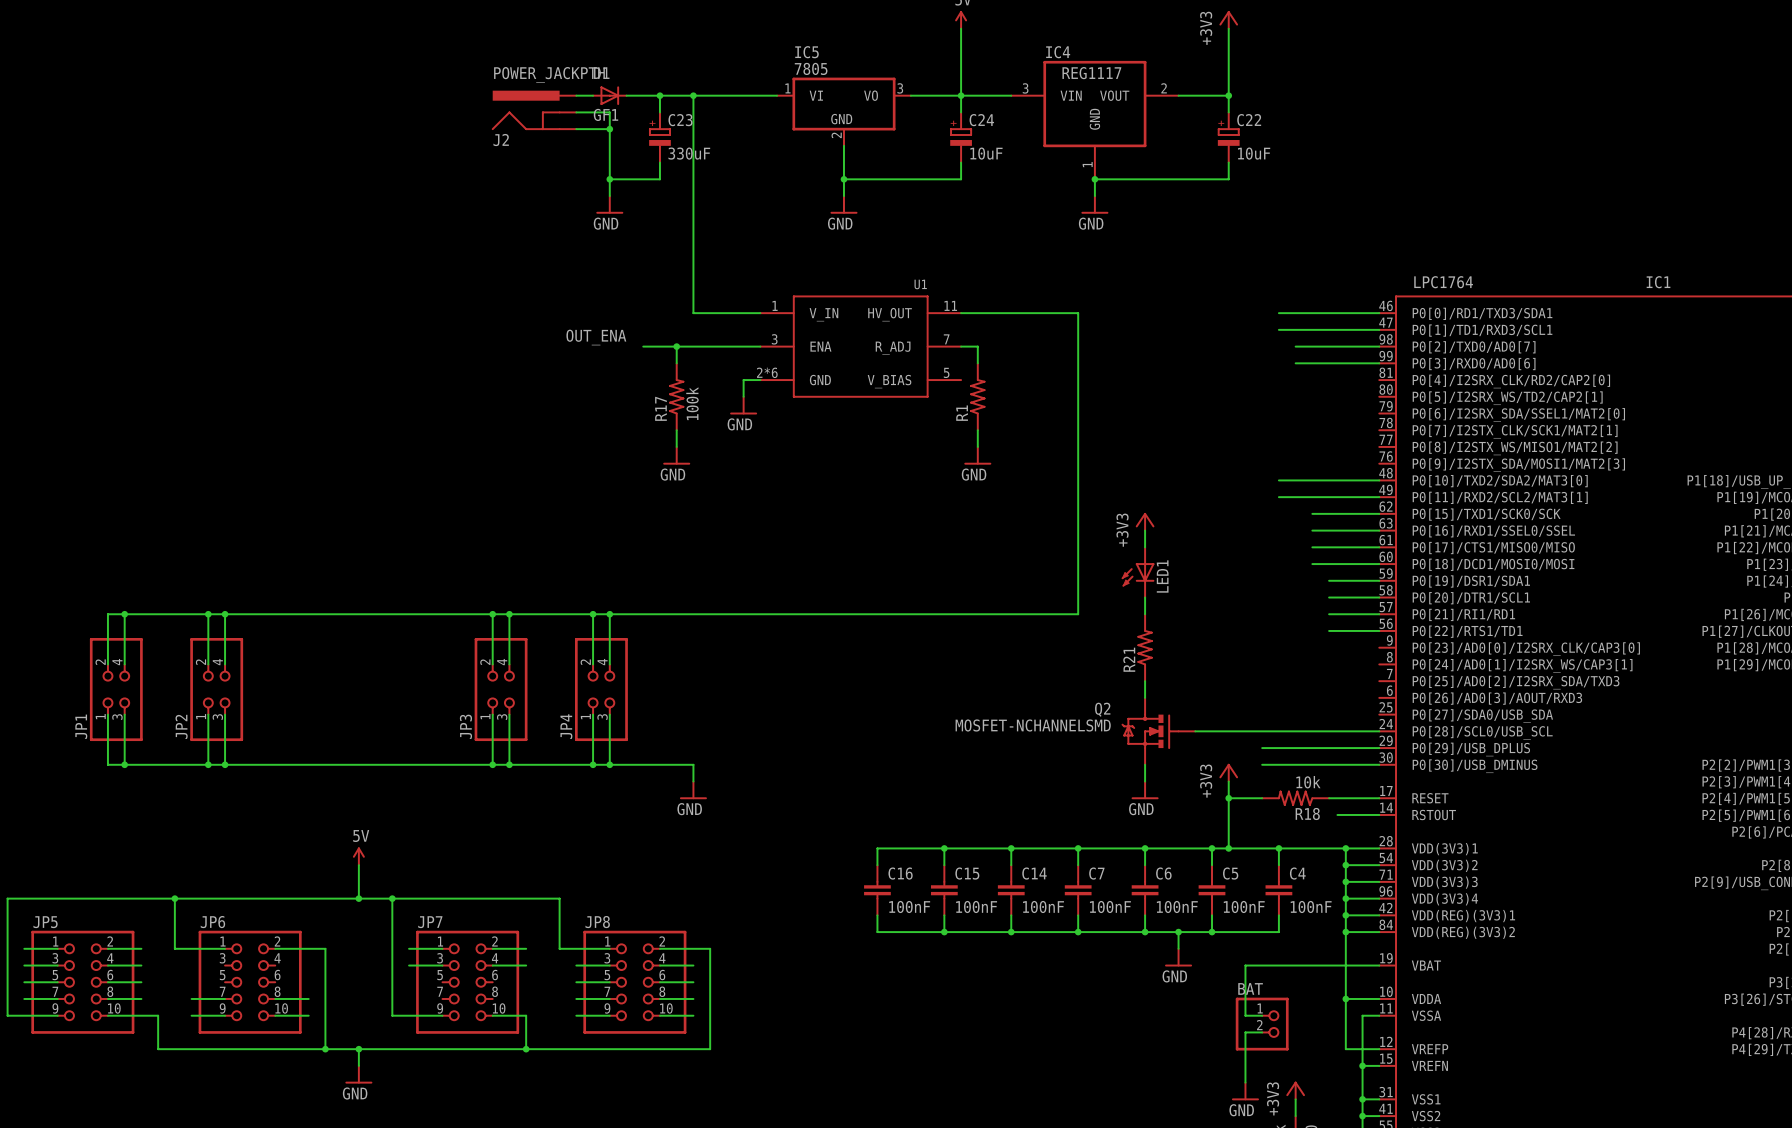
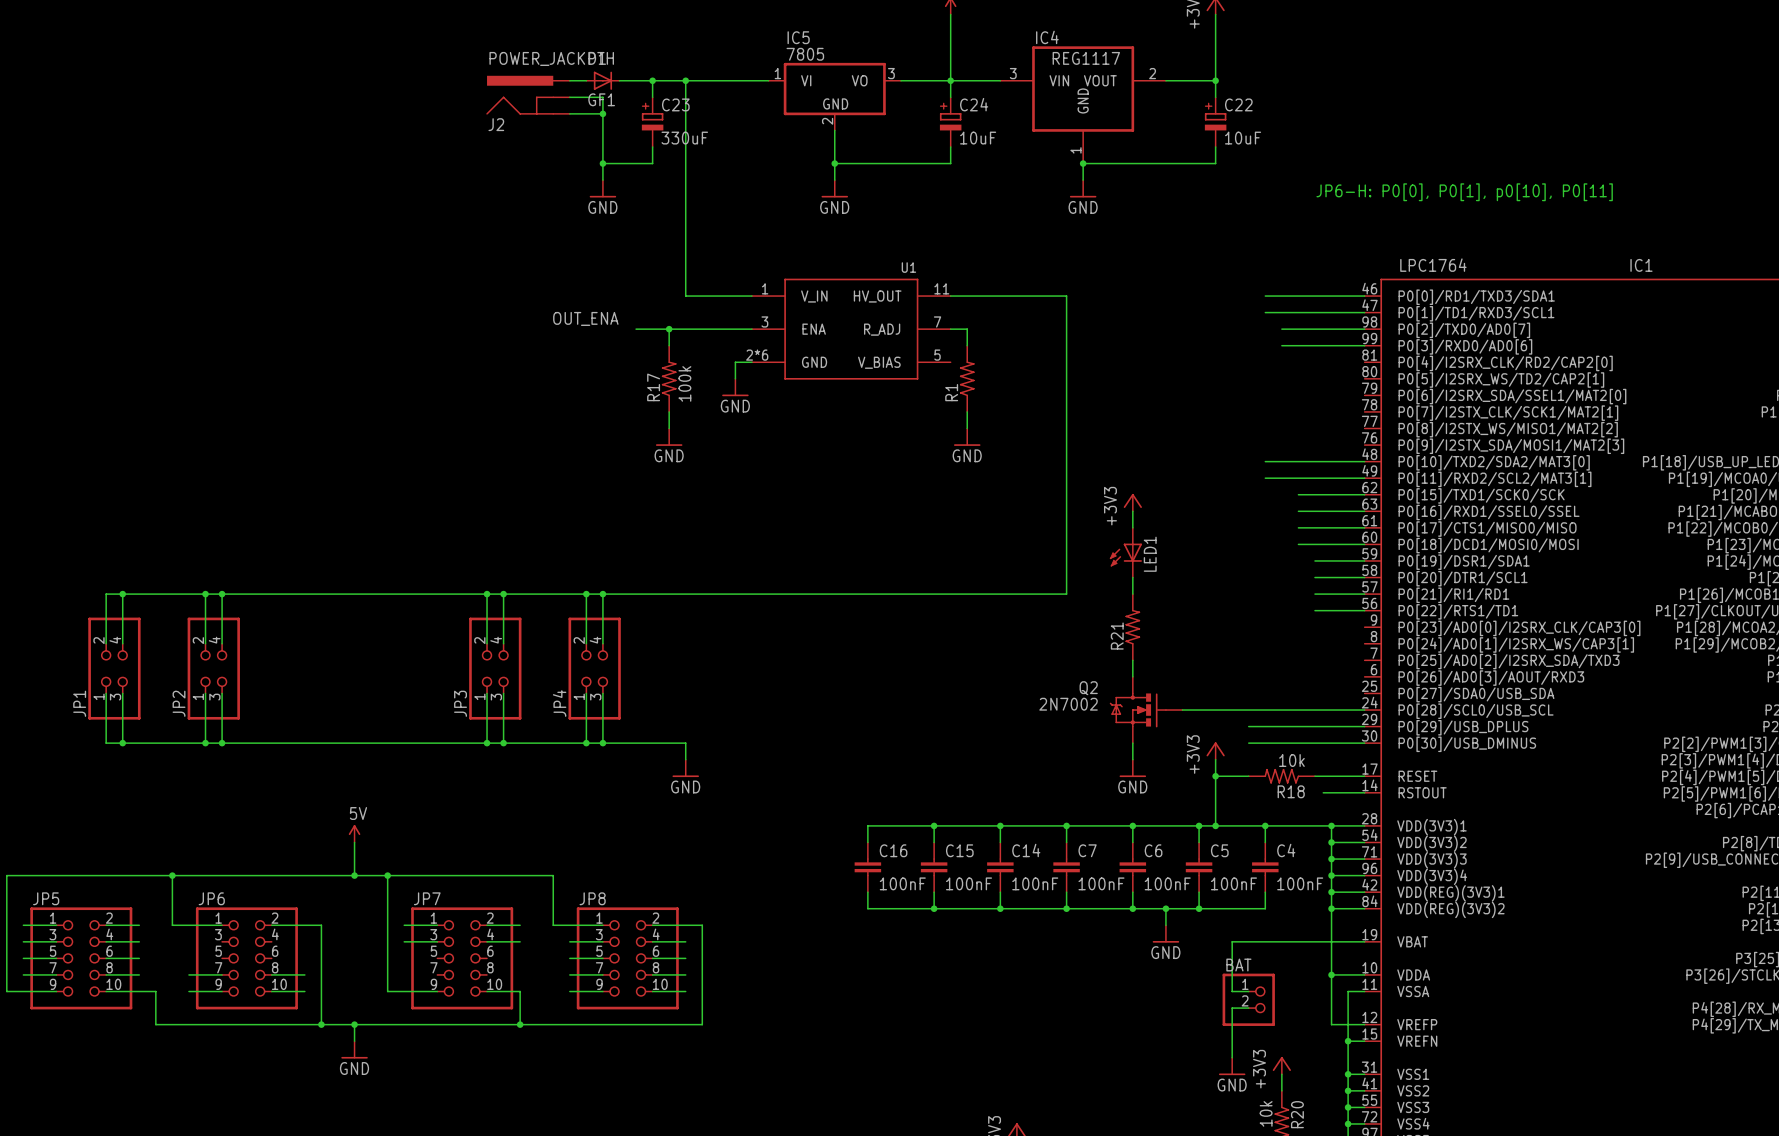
text: none -> JP6-H: P0[0], P0[1], p0[10], P0[11] (1464, 192)
Q2 value: MOSFET-NCHANNELSMD (1033, 725) -> 2N7002 (1068, 704)

